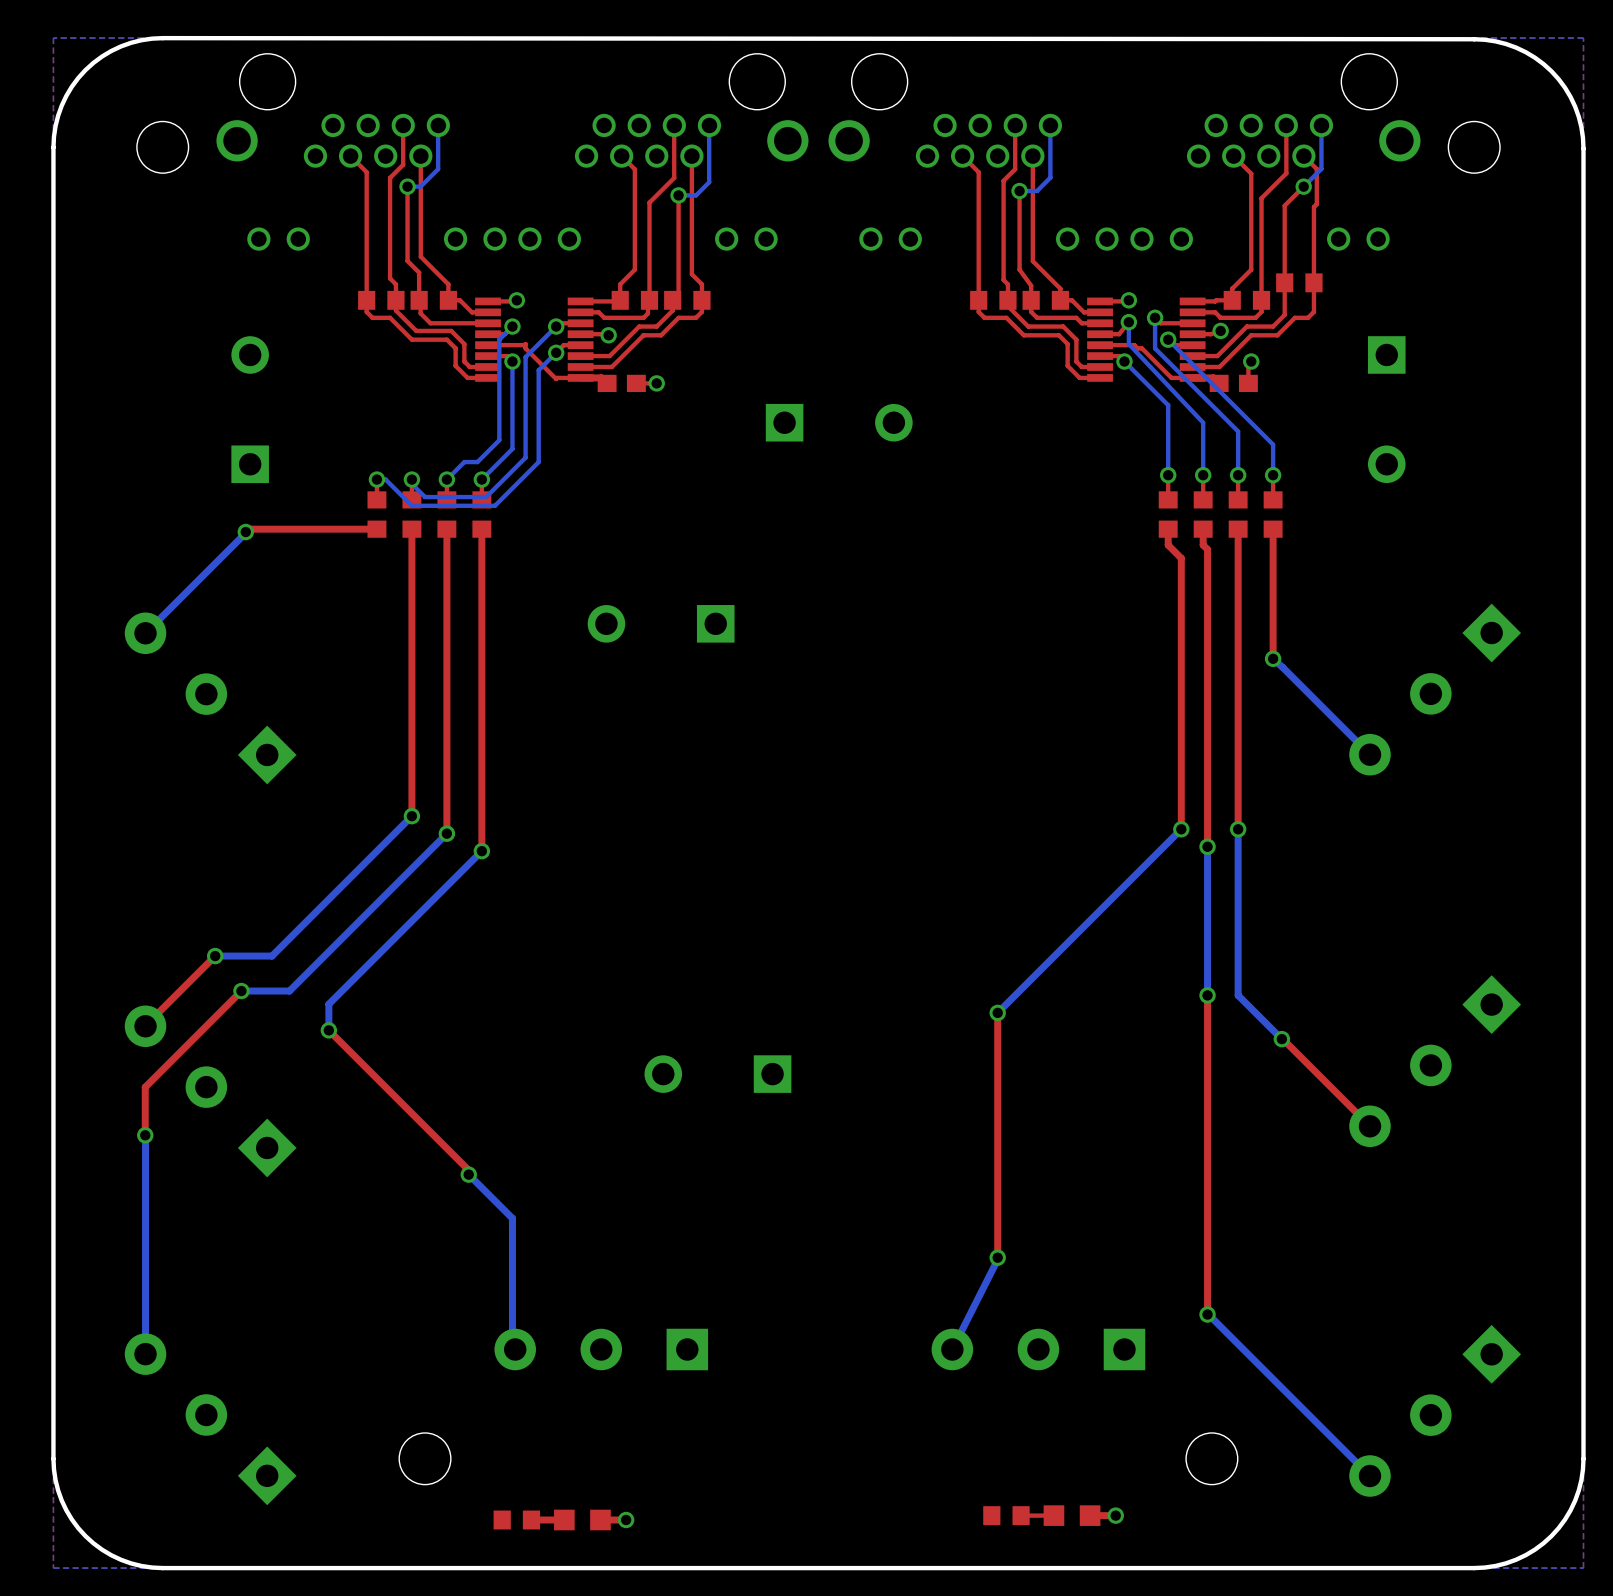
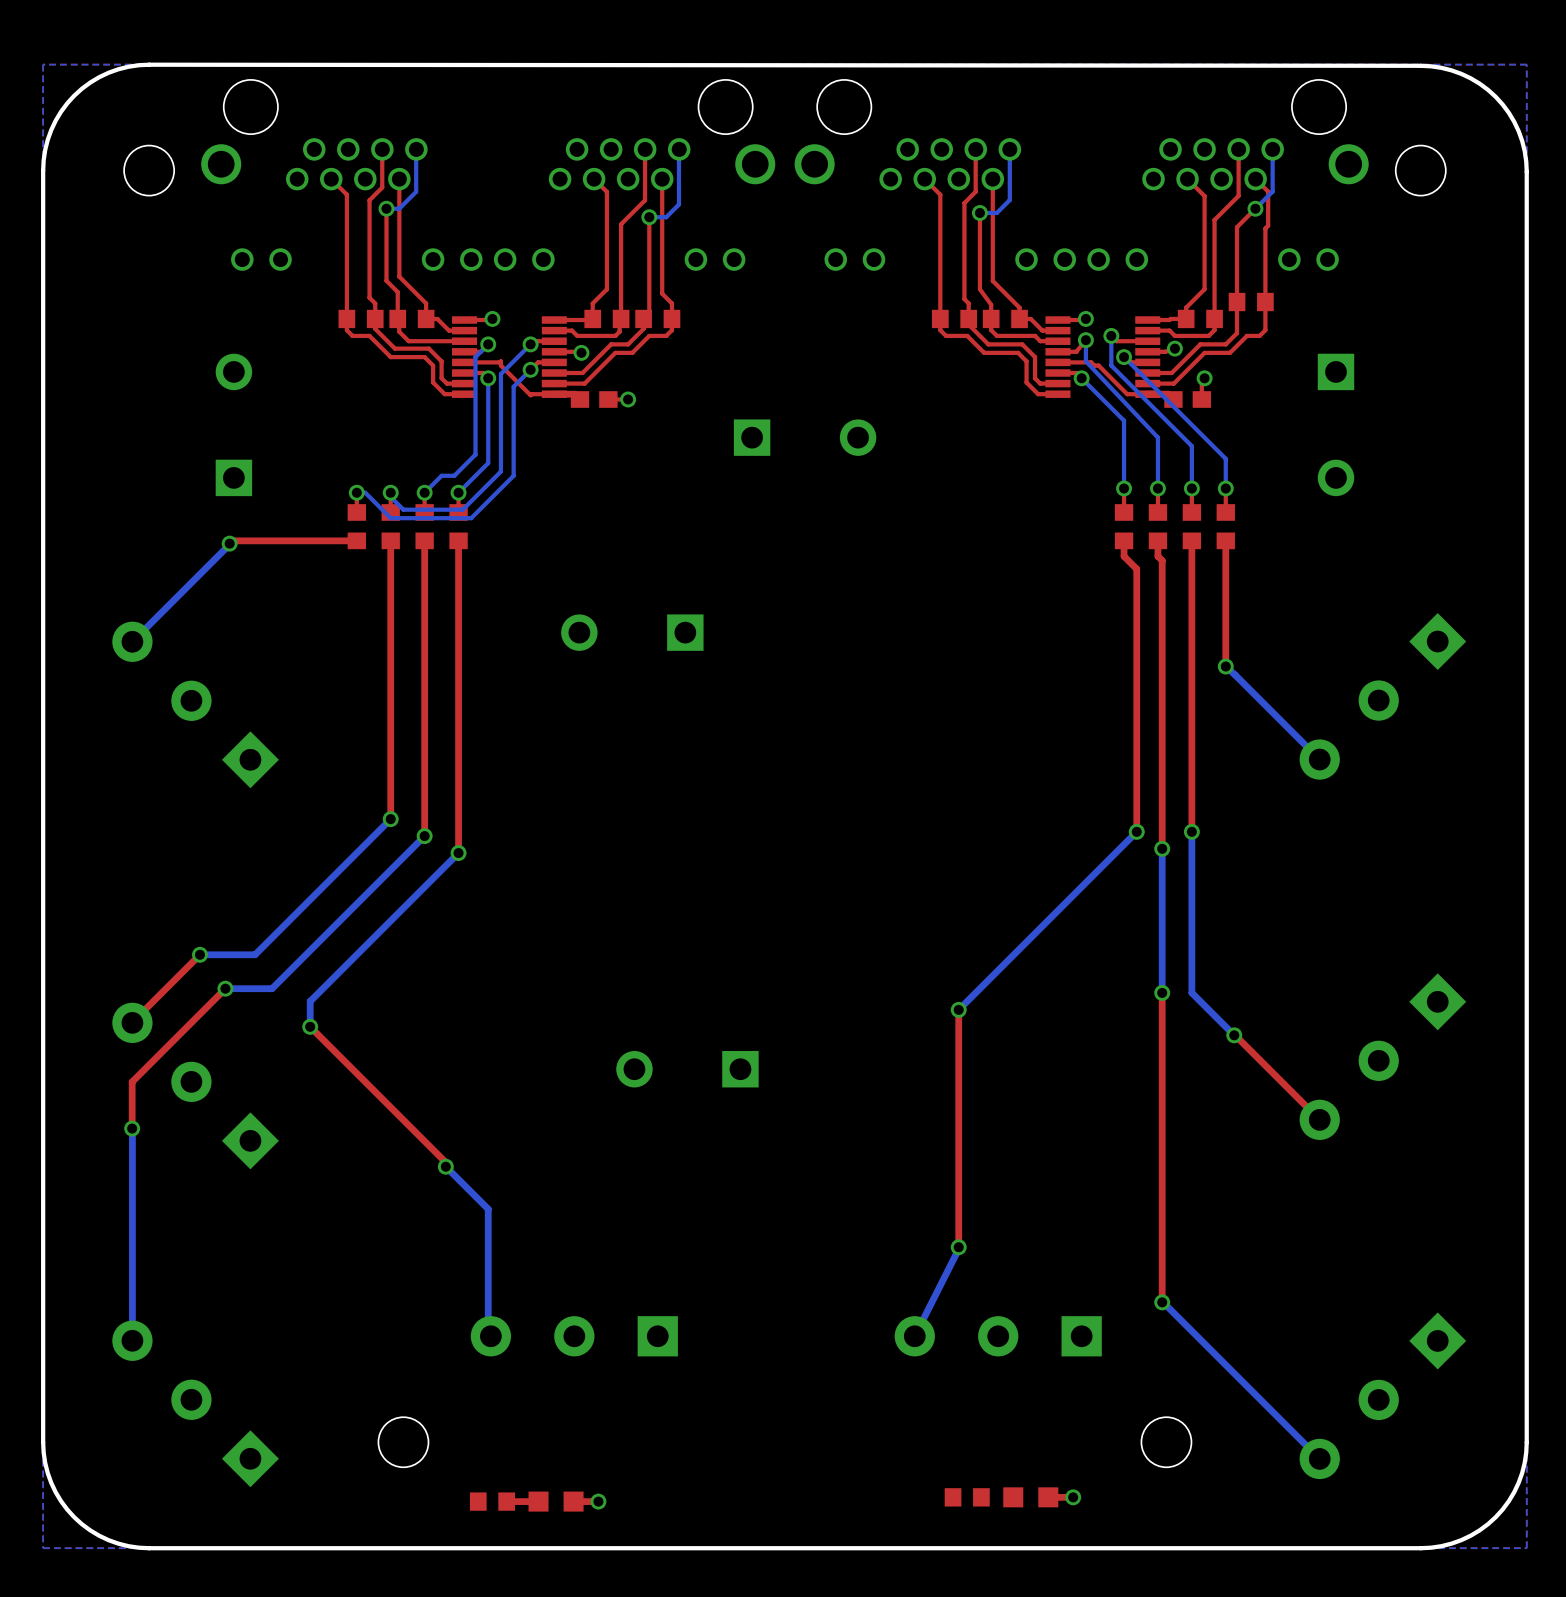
top track: (1053, 1515) (1021, 1515) -> none

